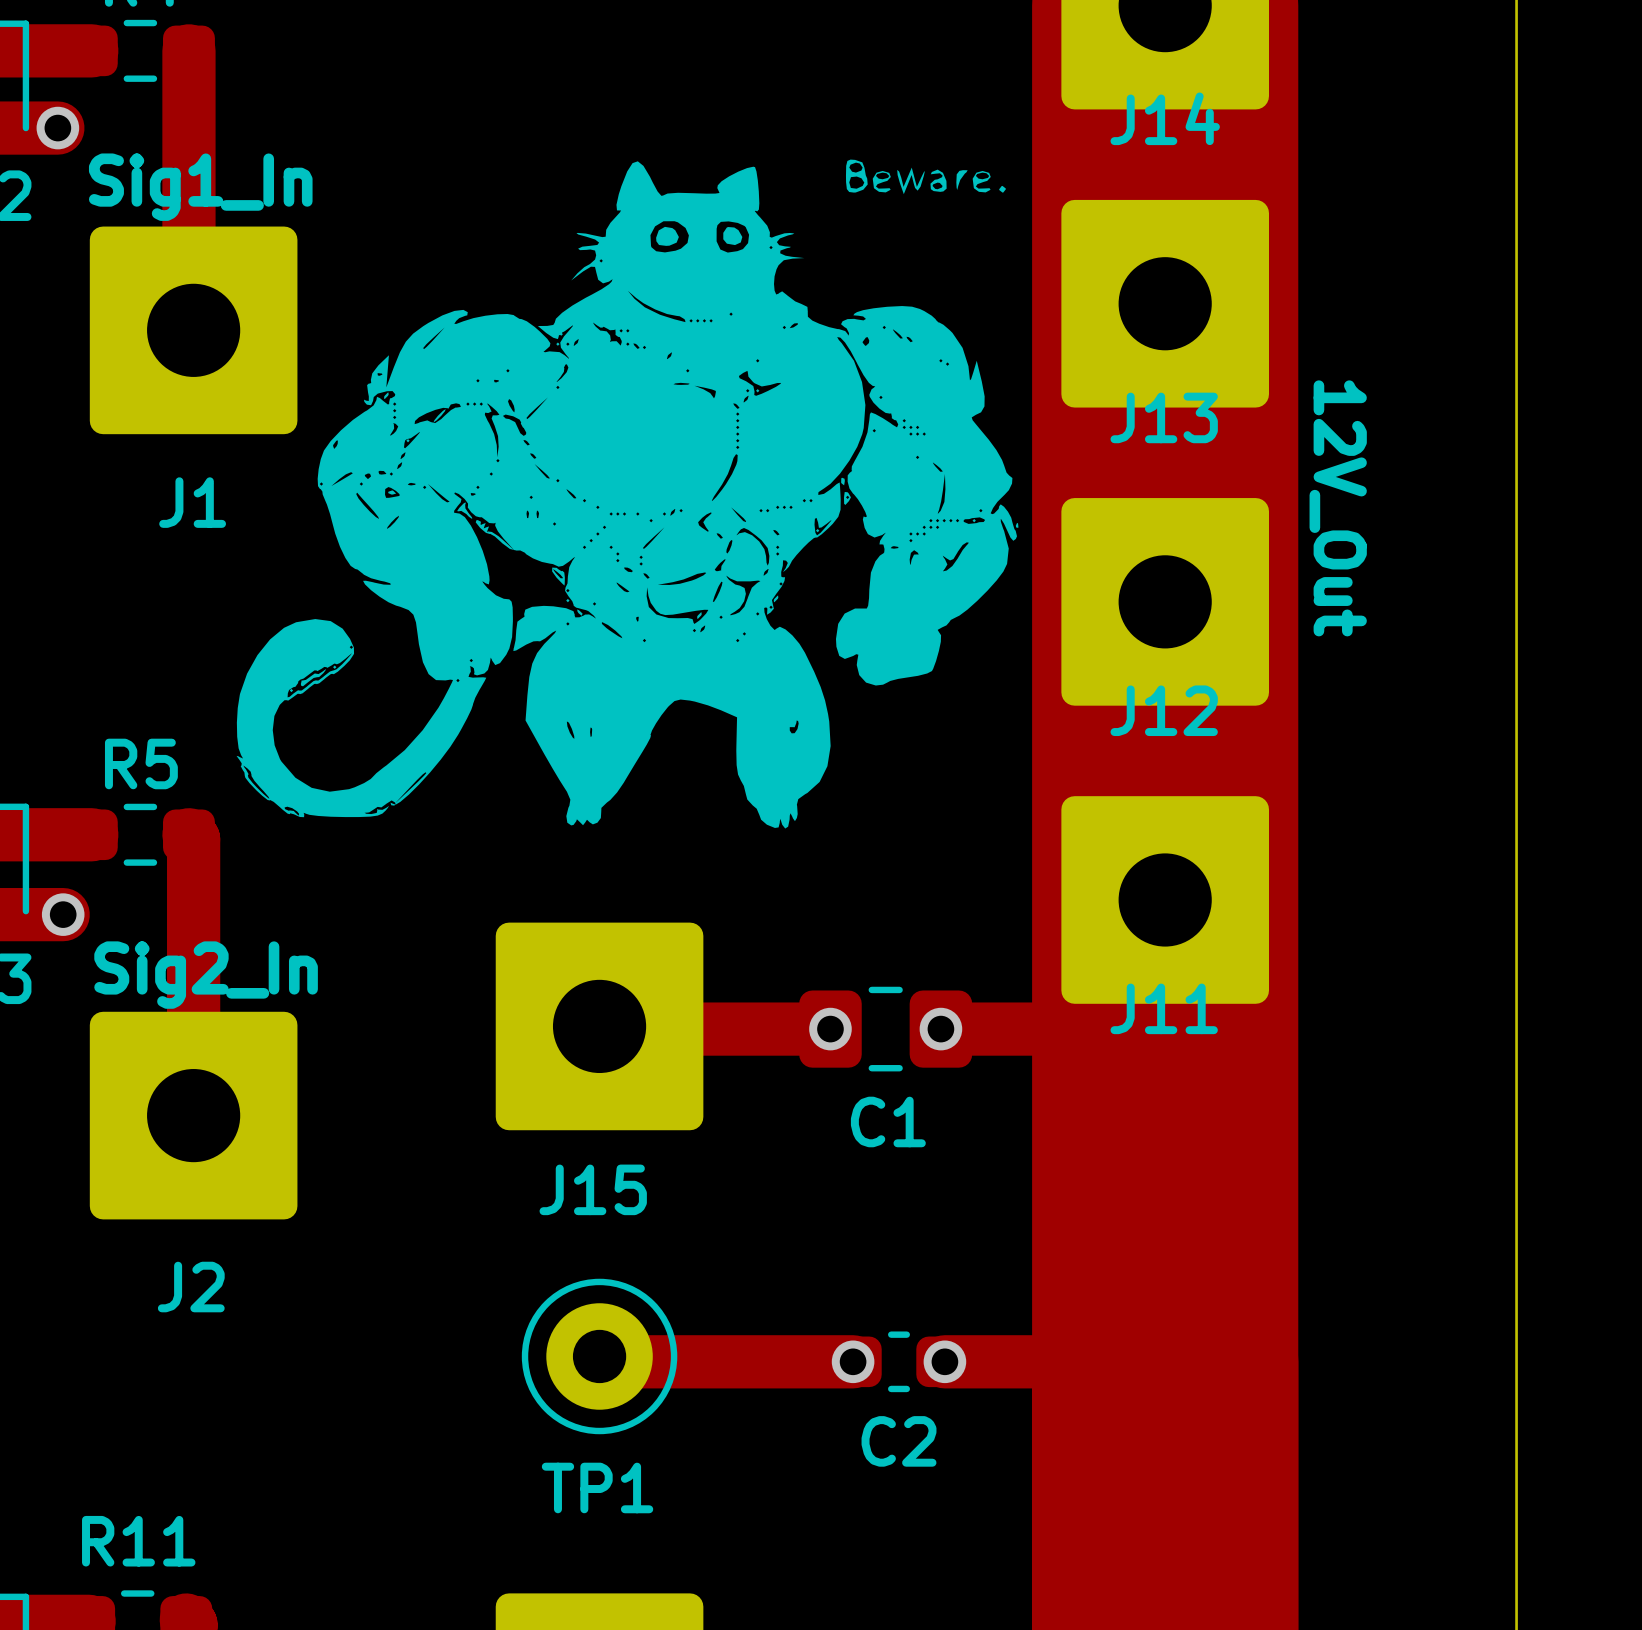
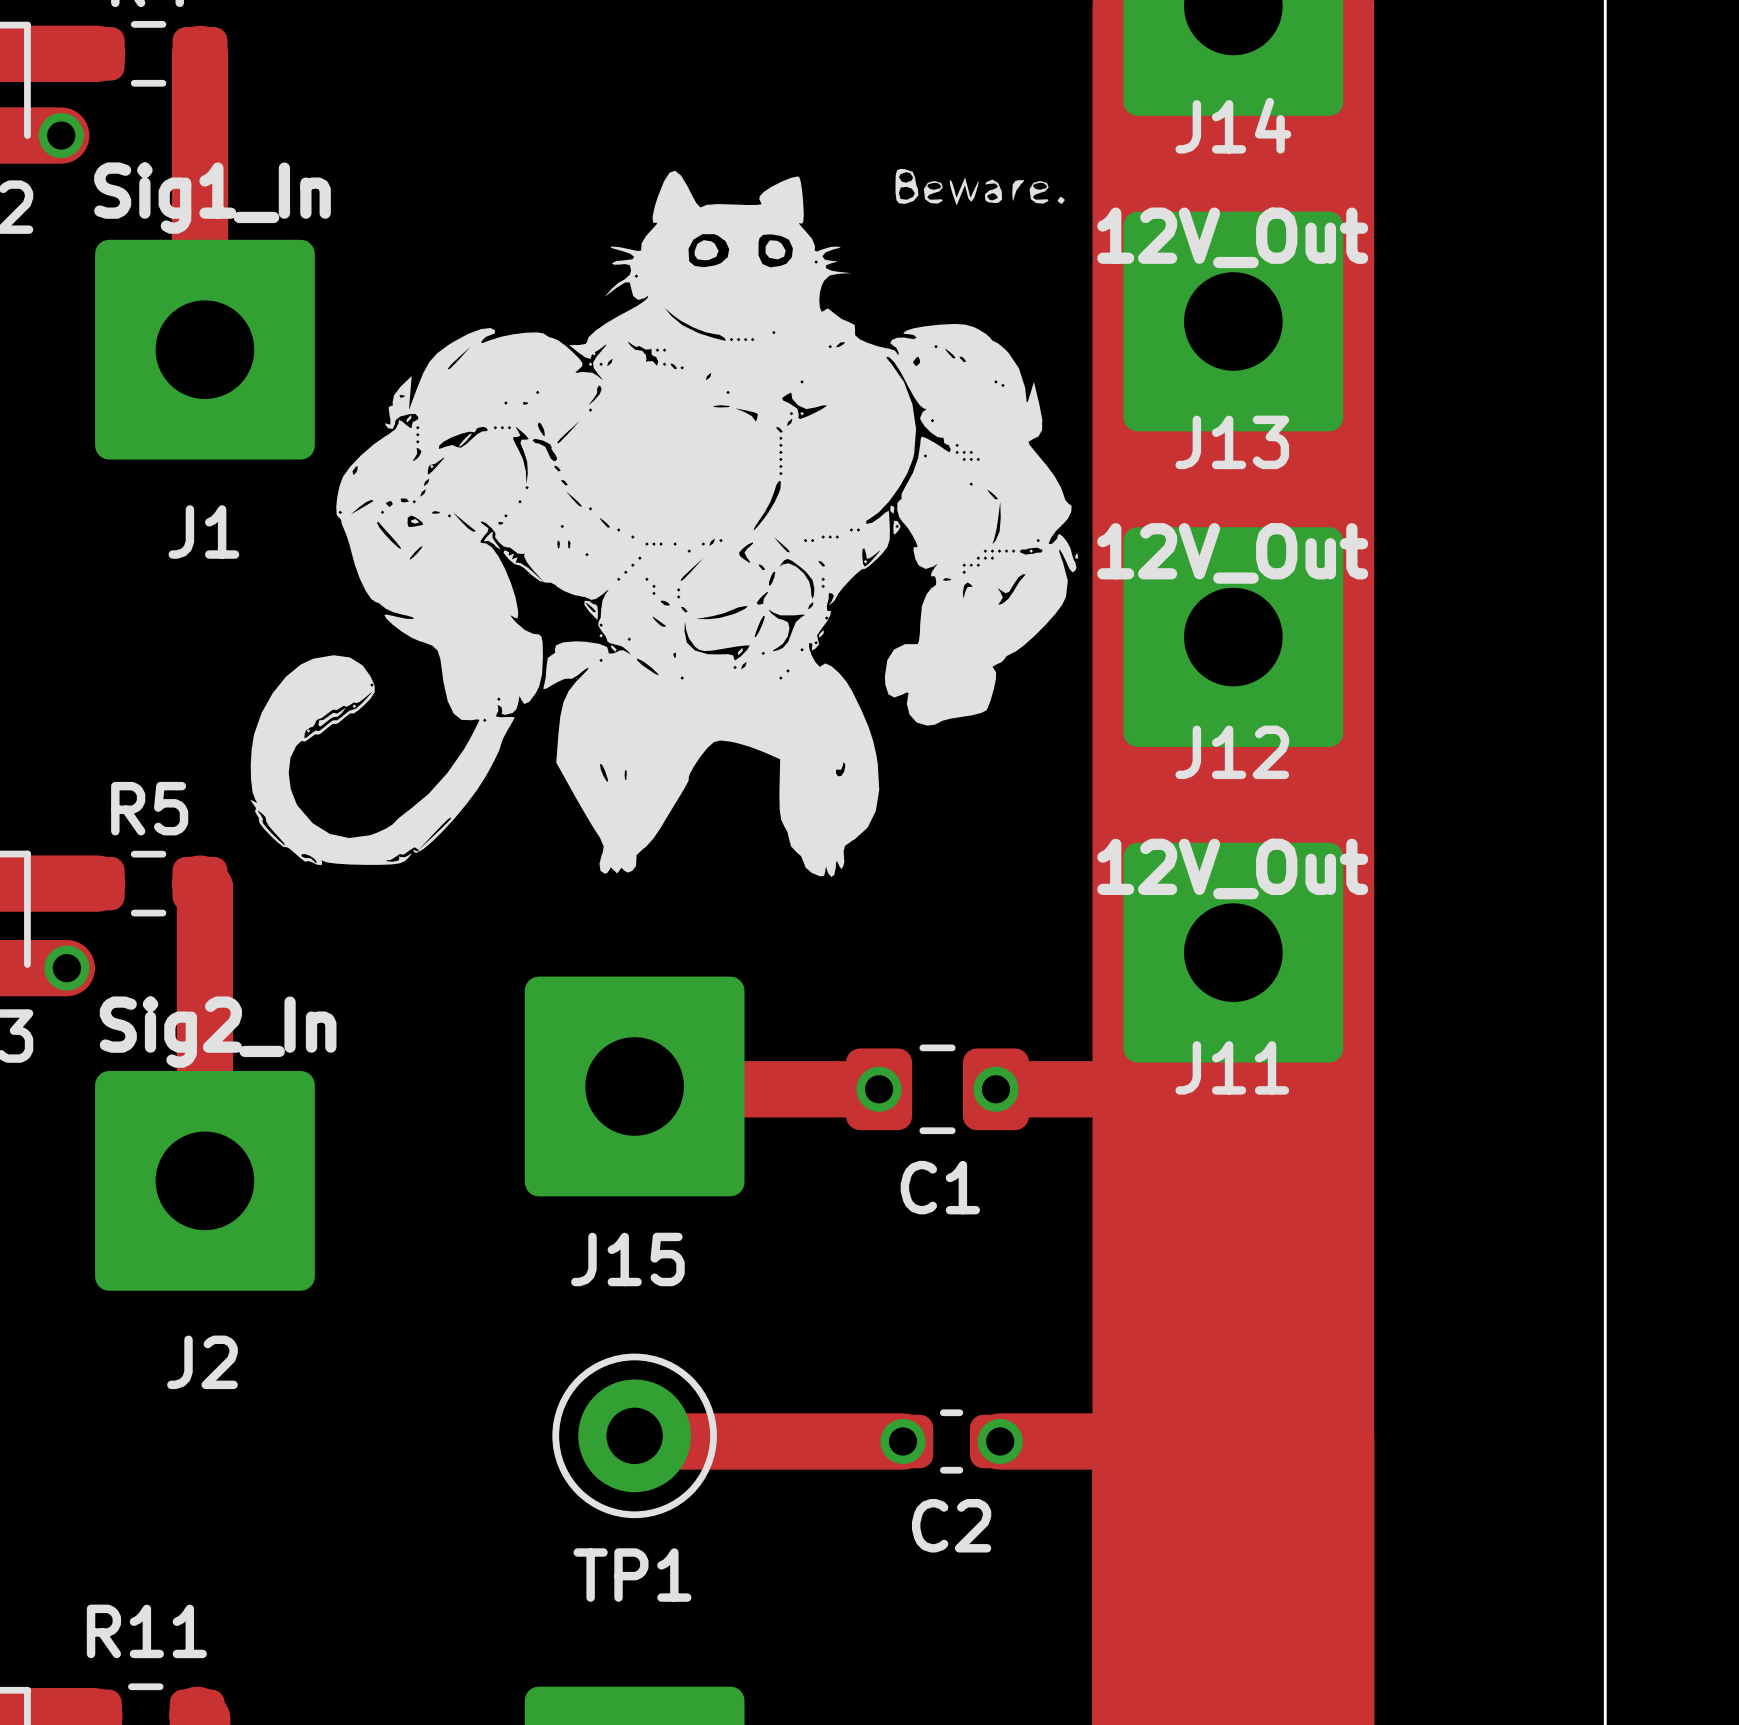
text: none -> 12V_Out (1232, 237)
text rotation: 0° (1338, 508) -> 90° counterclockwise (1232, 553)
text: none -> 12V_Out (1232, 868)

